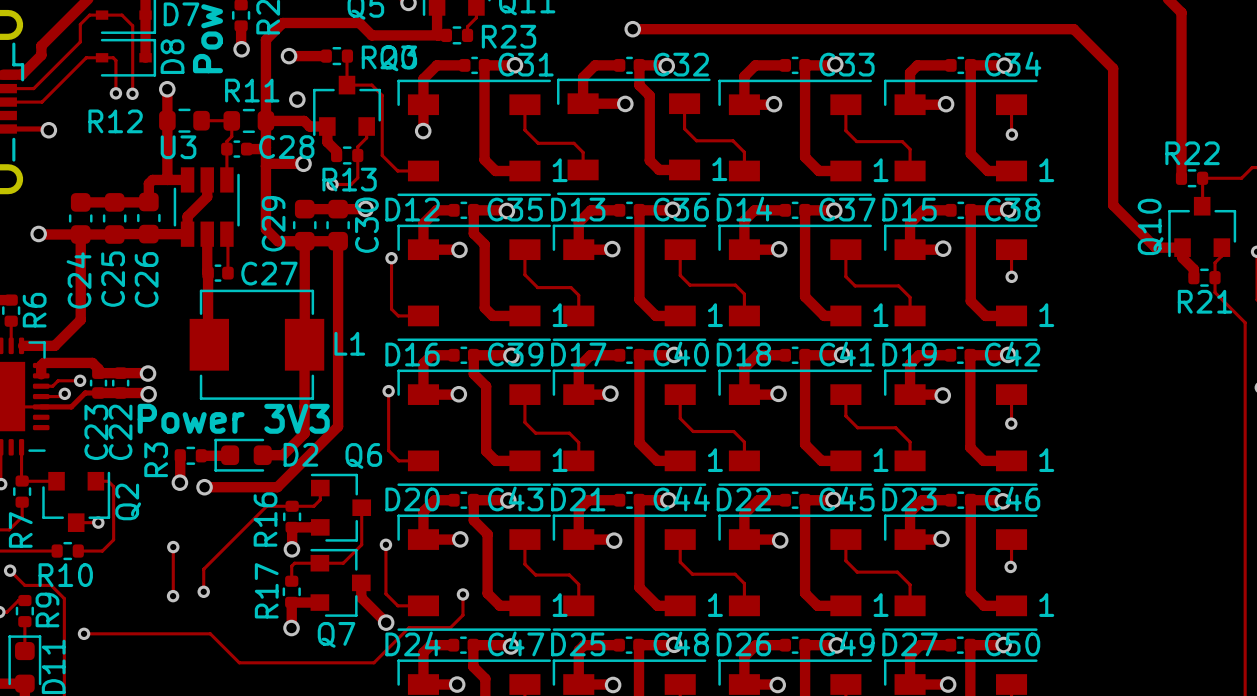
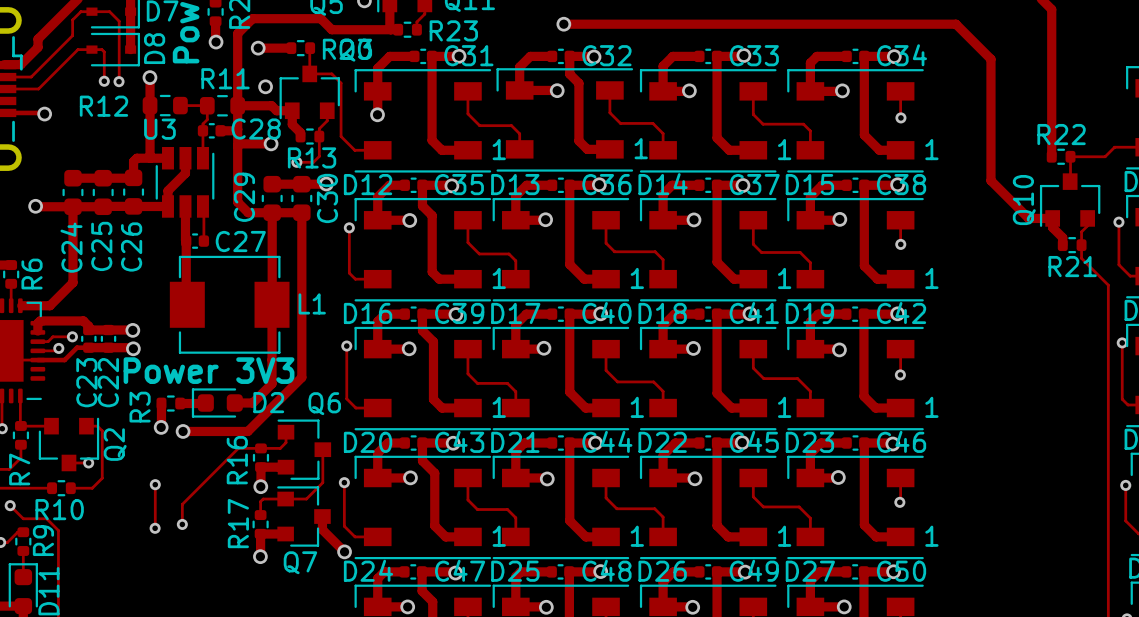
track: (462, 594) (462, 615) (450, 627) (409, 627) (373, 662) (239, 662) (210, 633) (84, 633) -> none
via: (462, 594) -> none
via: (84, 633) -> none

